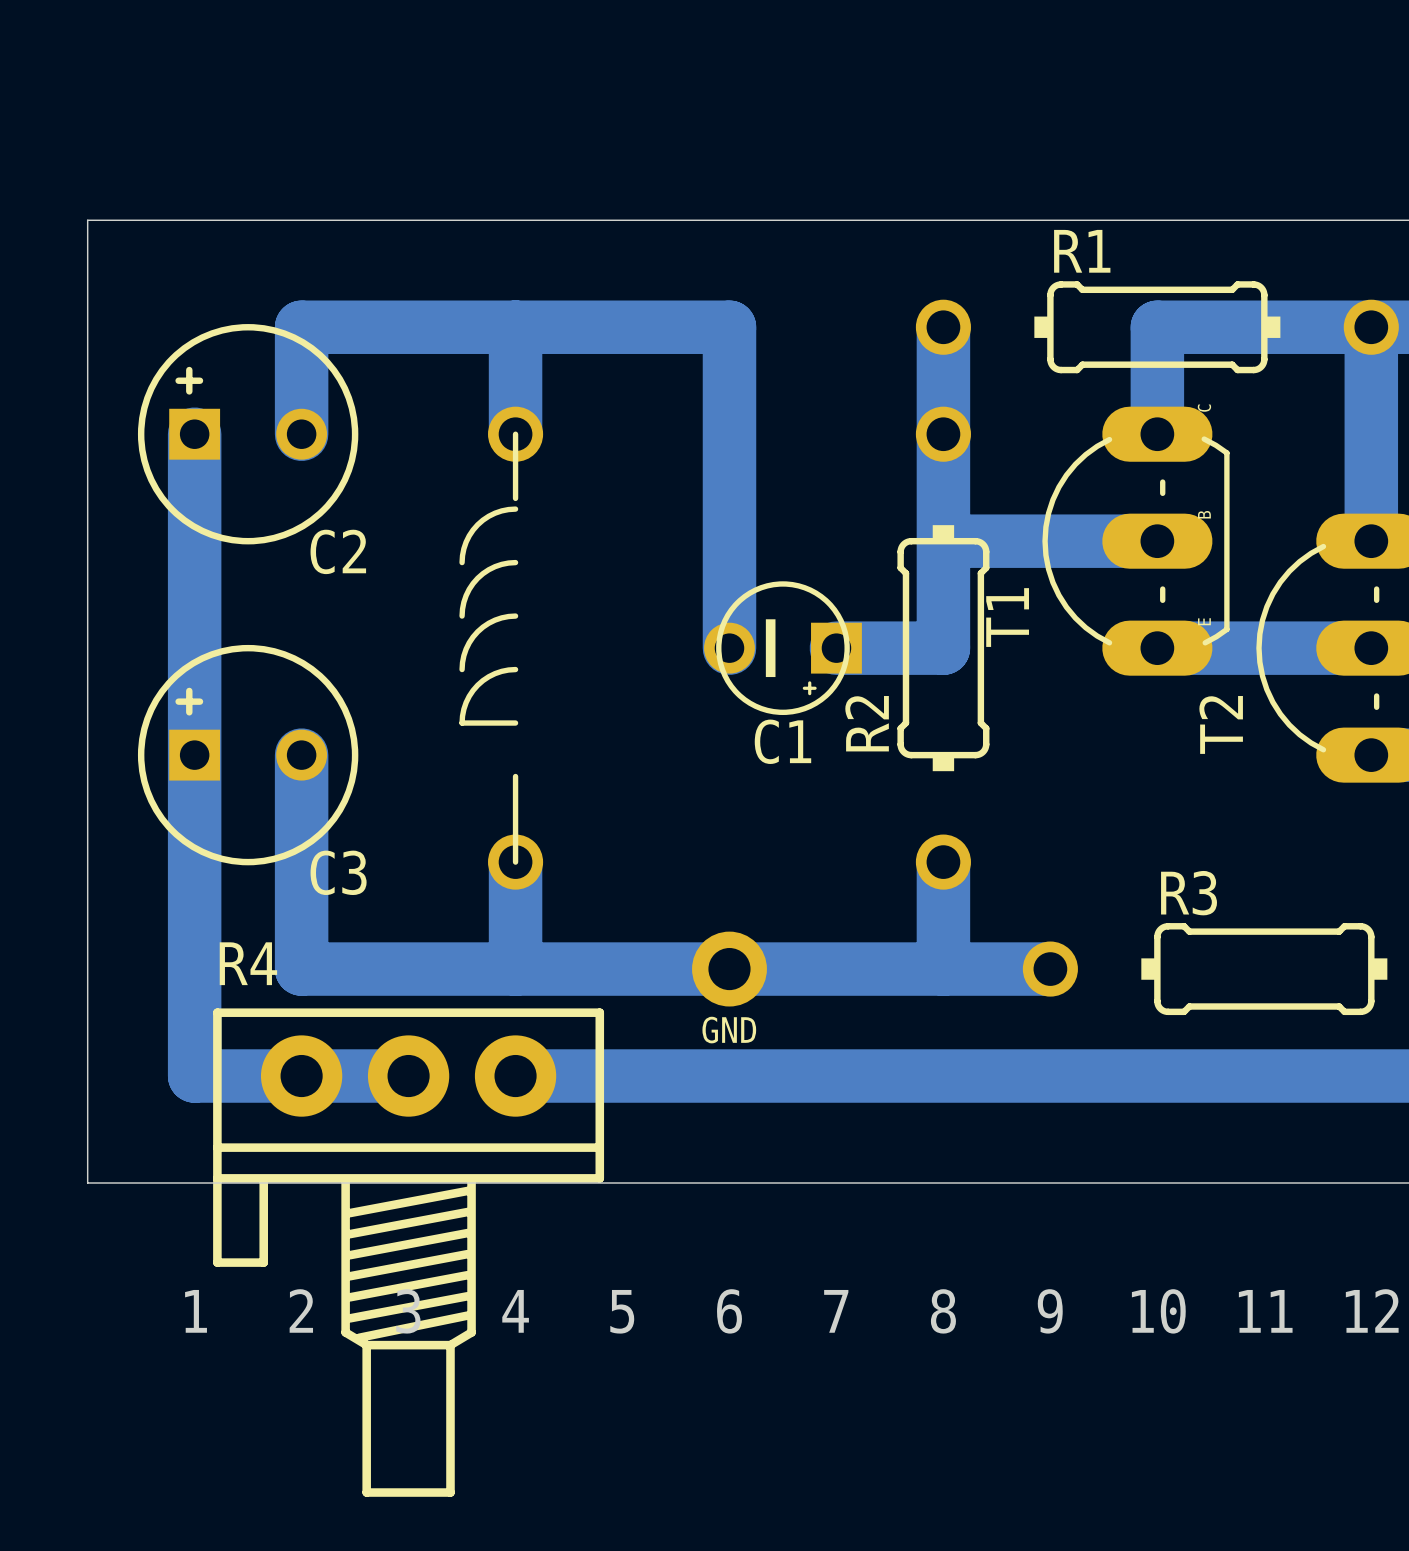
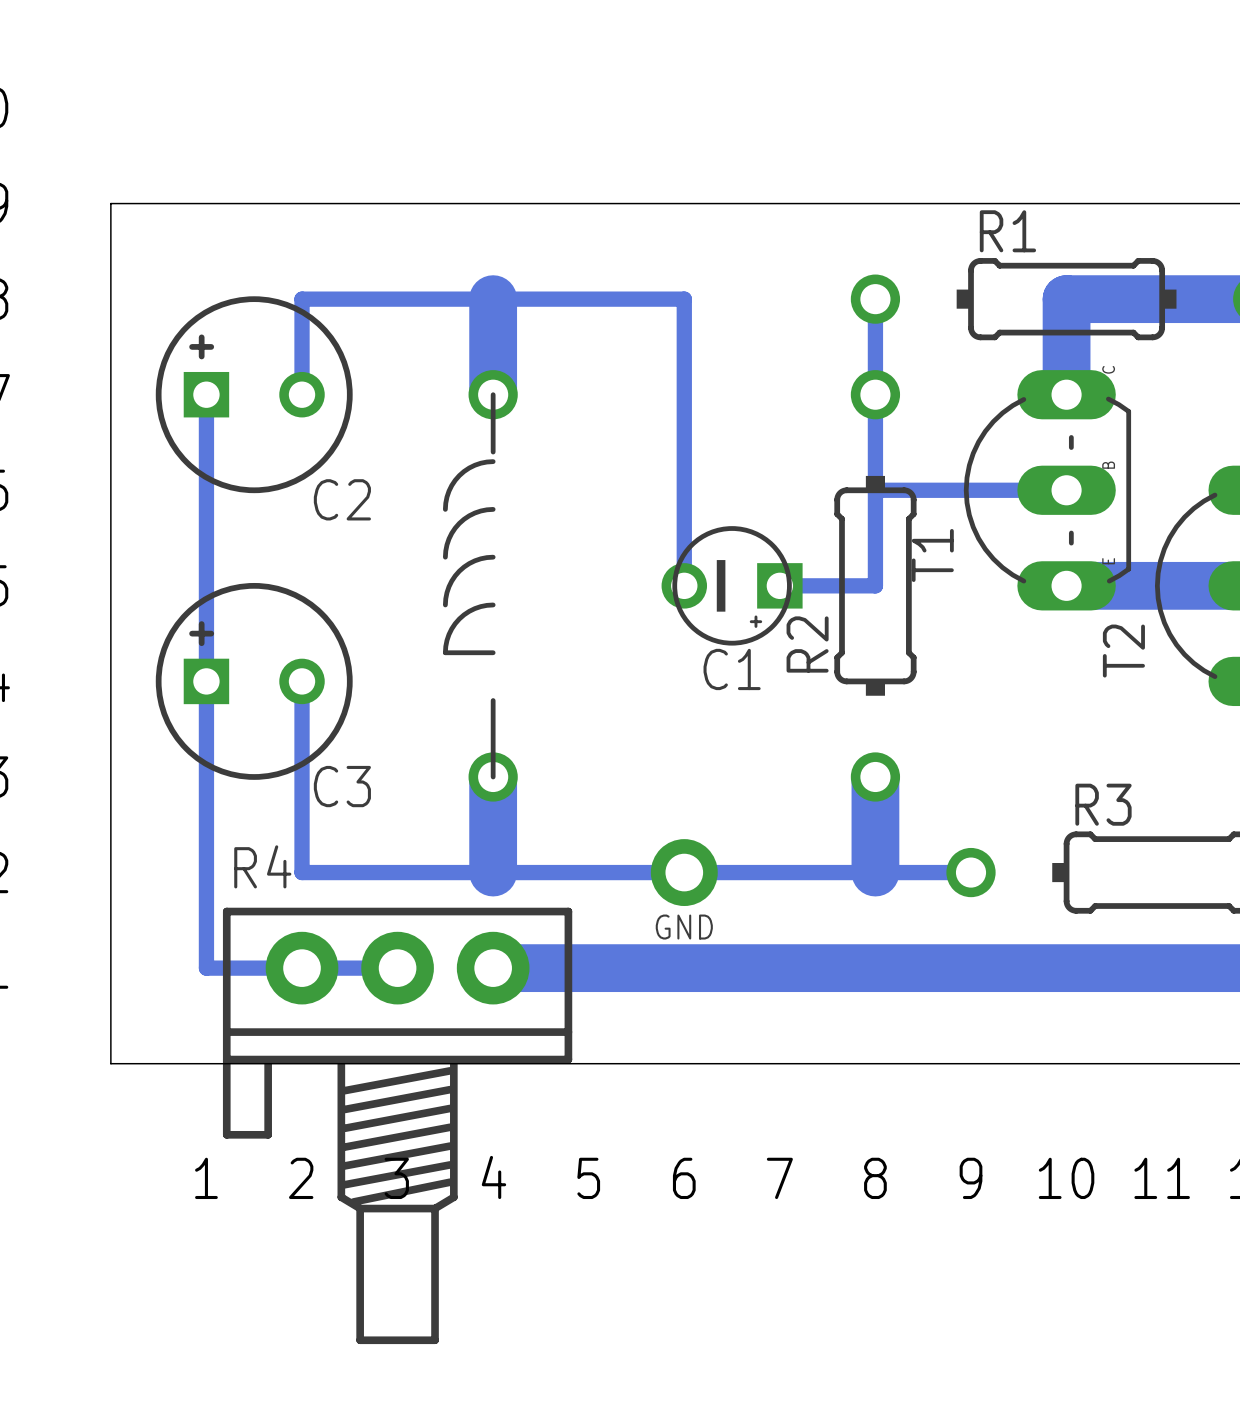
bottom track width: thick (943, 327) (943, 648) (836, 648) -> thin (875, 299) (875, 585) (779, 585)
bottom track width: thick (194, 434) (194, 1076) (408, 1076) -> thin (206, 394) (206, 968) (397, 968)
bottom track width: thick (301, 434) (301, 327) (729, 327) (729, 648) -> thin (302, 394) (302, 299) (684, 299) (684, 585)
bottom track width: thick (943, 541) (1157, 541) -> thin (875, 490) (1066, 490)
bottom track width: thick (301, 755) (301, 969) (1050, 969) -> thin (302, 681) (302, 872) (971, 872)

